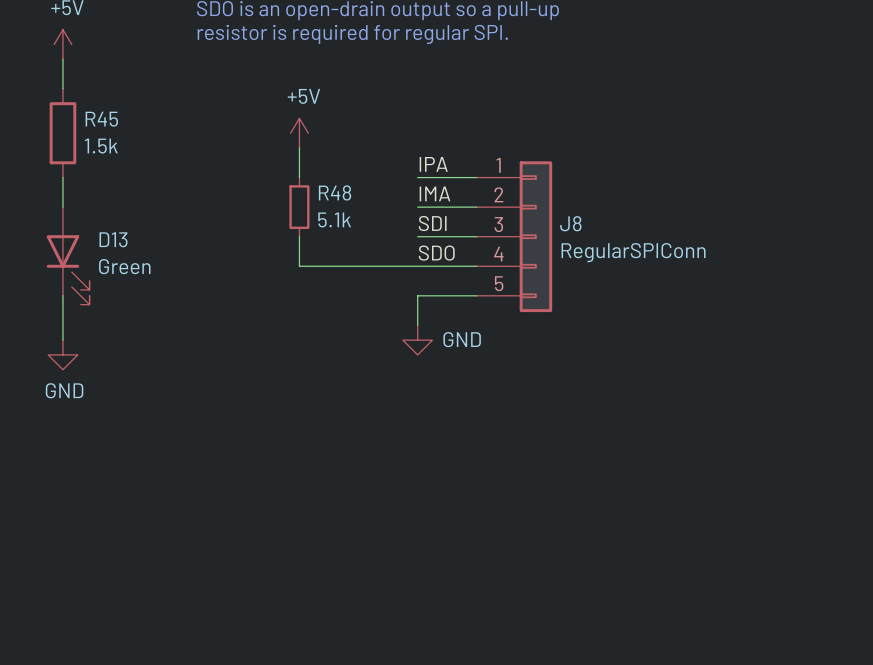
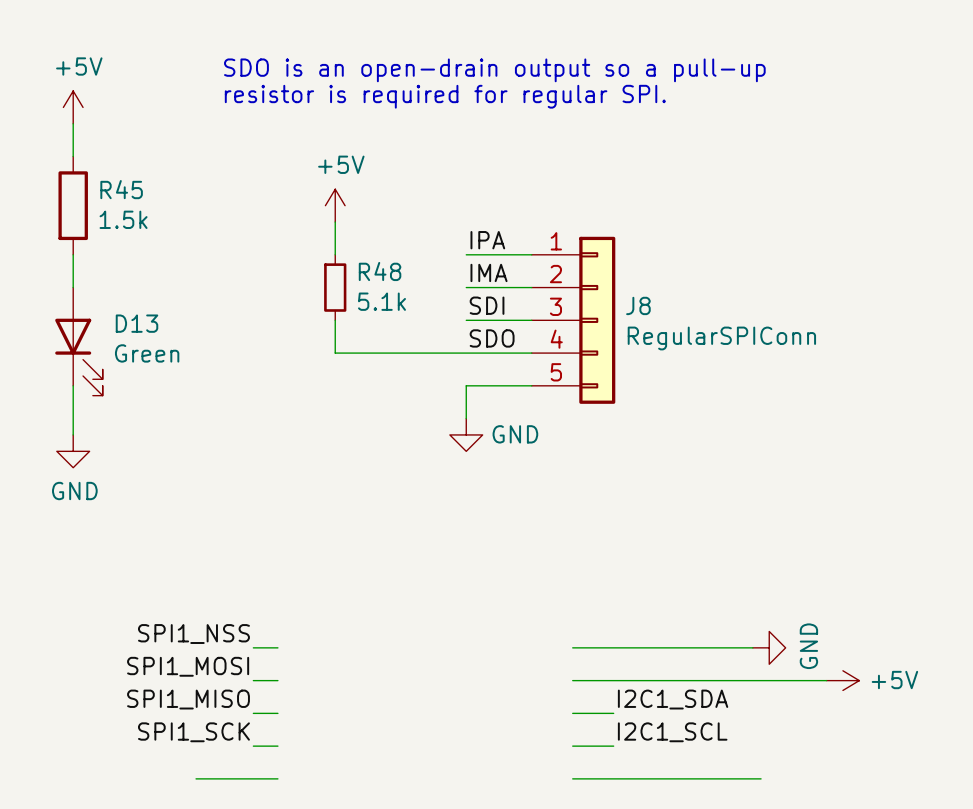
label: none -> SPI1_NSS (193, 634)
wire: none -> (253, 647) (277, 647)
wire: none -> (572, 647) (752, 647)
power symbol: none -> GND (769, 647)
label: none -> SPI1_MOSI (188, 666)
wire: none -> (253, 680) (277, 680)
wire: none -> (572, 680) (826, 680)
power symbol: none -> +5V (842, 680)
label: none -> SPI1_MISO (188, 699)
label: none -> I2C1_SDA (673, 699)
wire: none -> (253, 713) (277, 713)
wire: none -> (572, 713) (613, 713)
label: none -> SPI1_SCK (193, 732)
label: none -> I2C1_SCL (672, 732)
wire: none -> (253, 746) (277, 746)
wire: none -> (572, 746) (613, 746)
wire: none -> (196, 778) (277, 778)
wire: none -> (572, 778) (761, 778)

